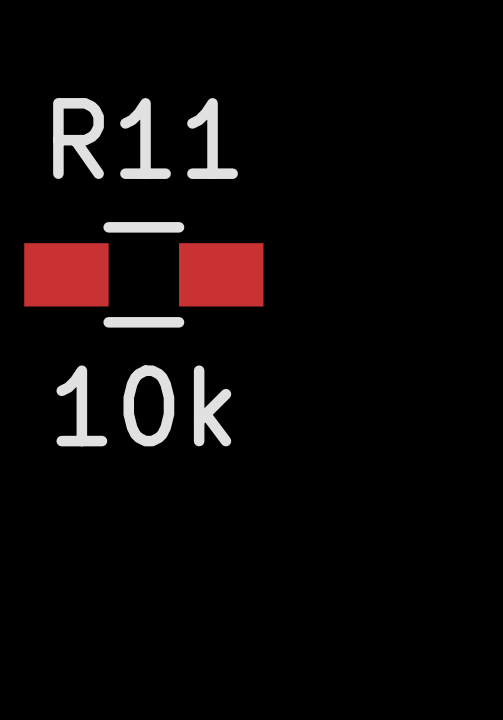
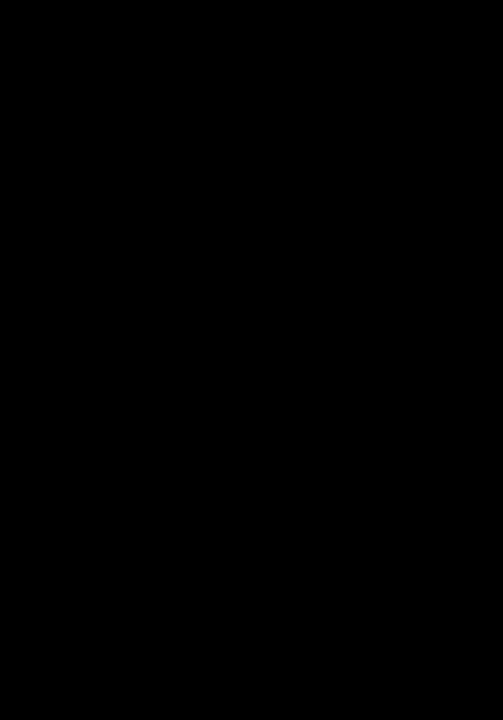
R11: 10k (143, 274) -> none

